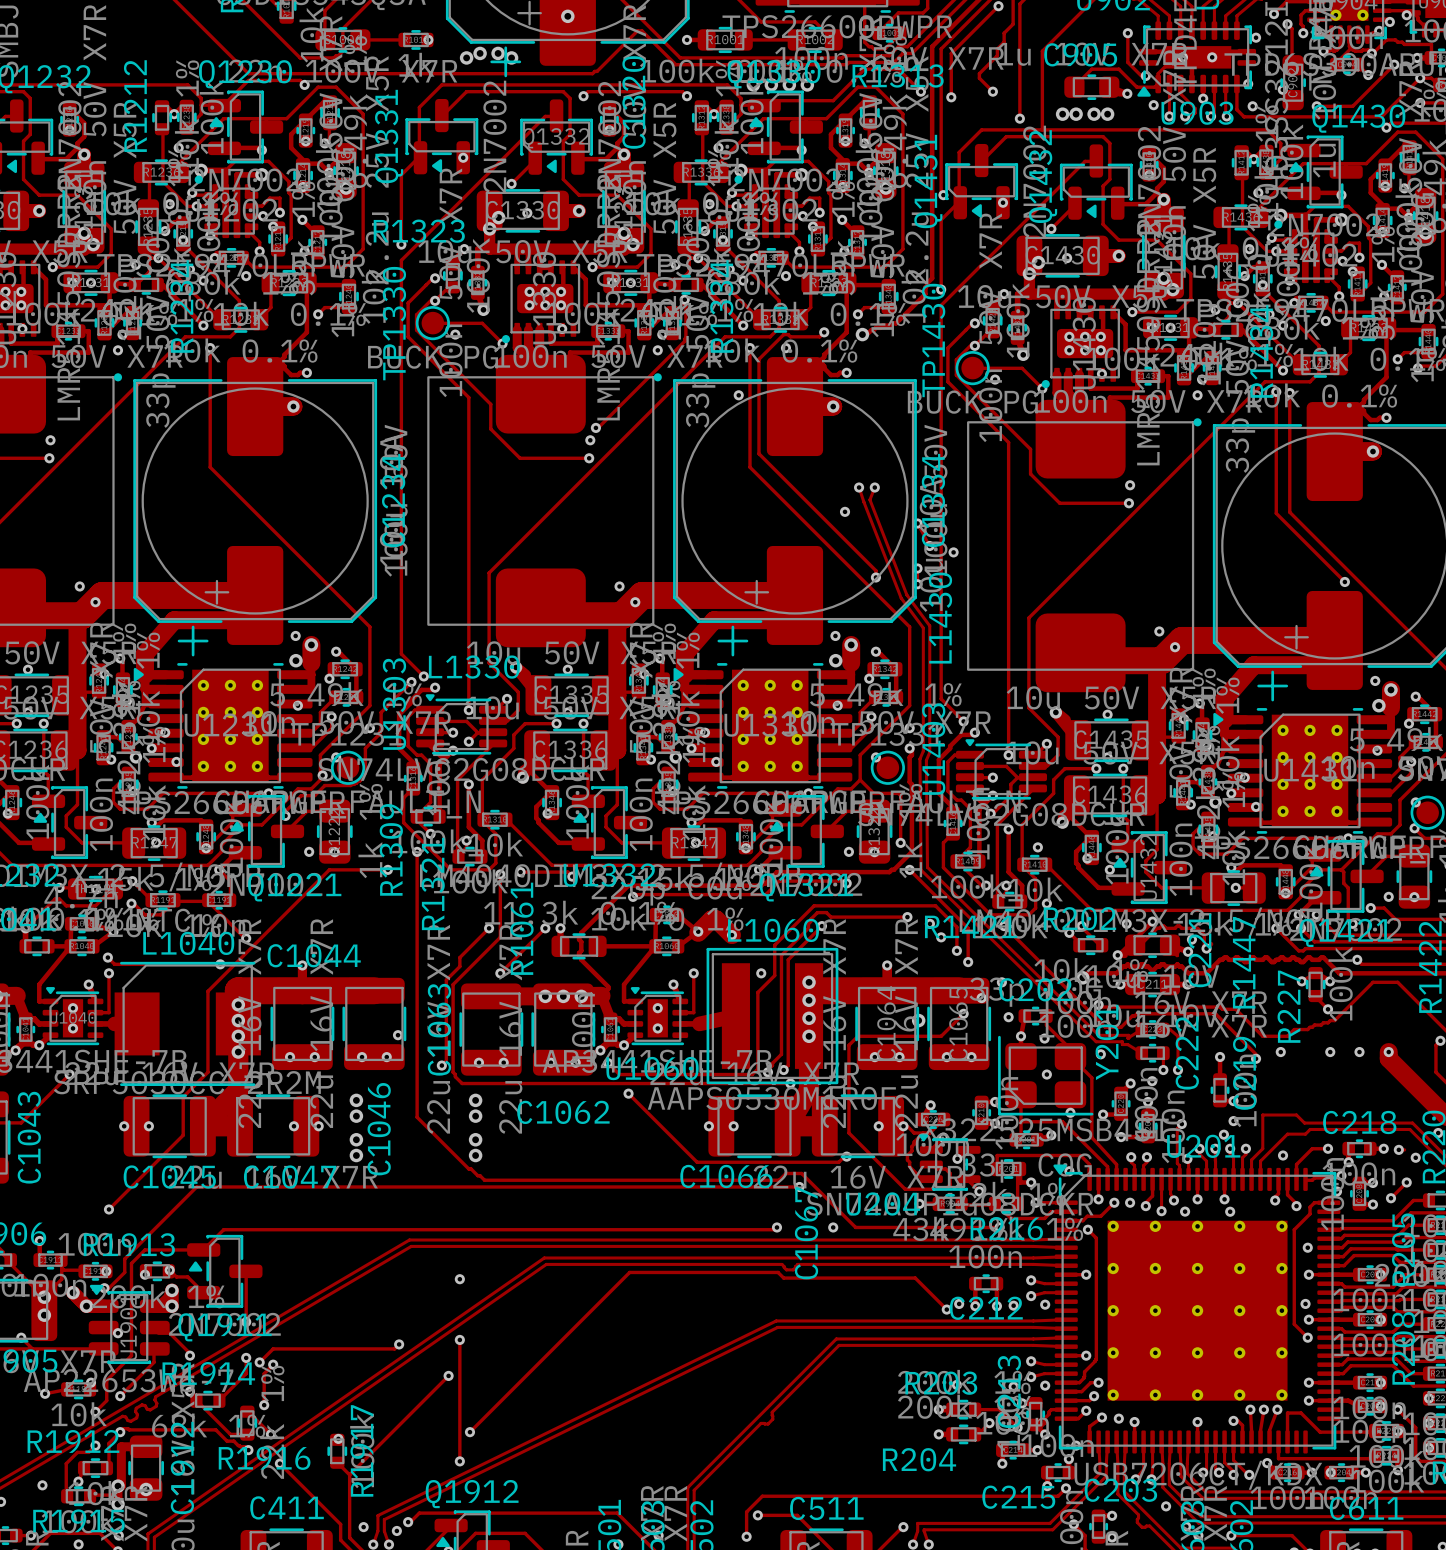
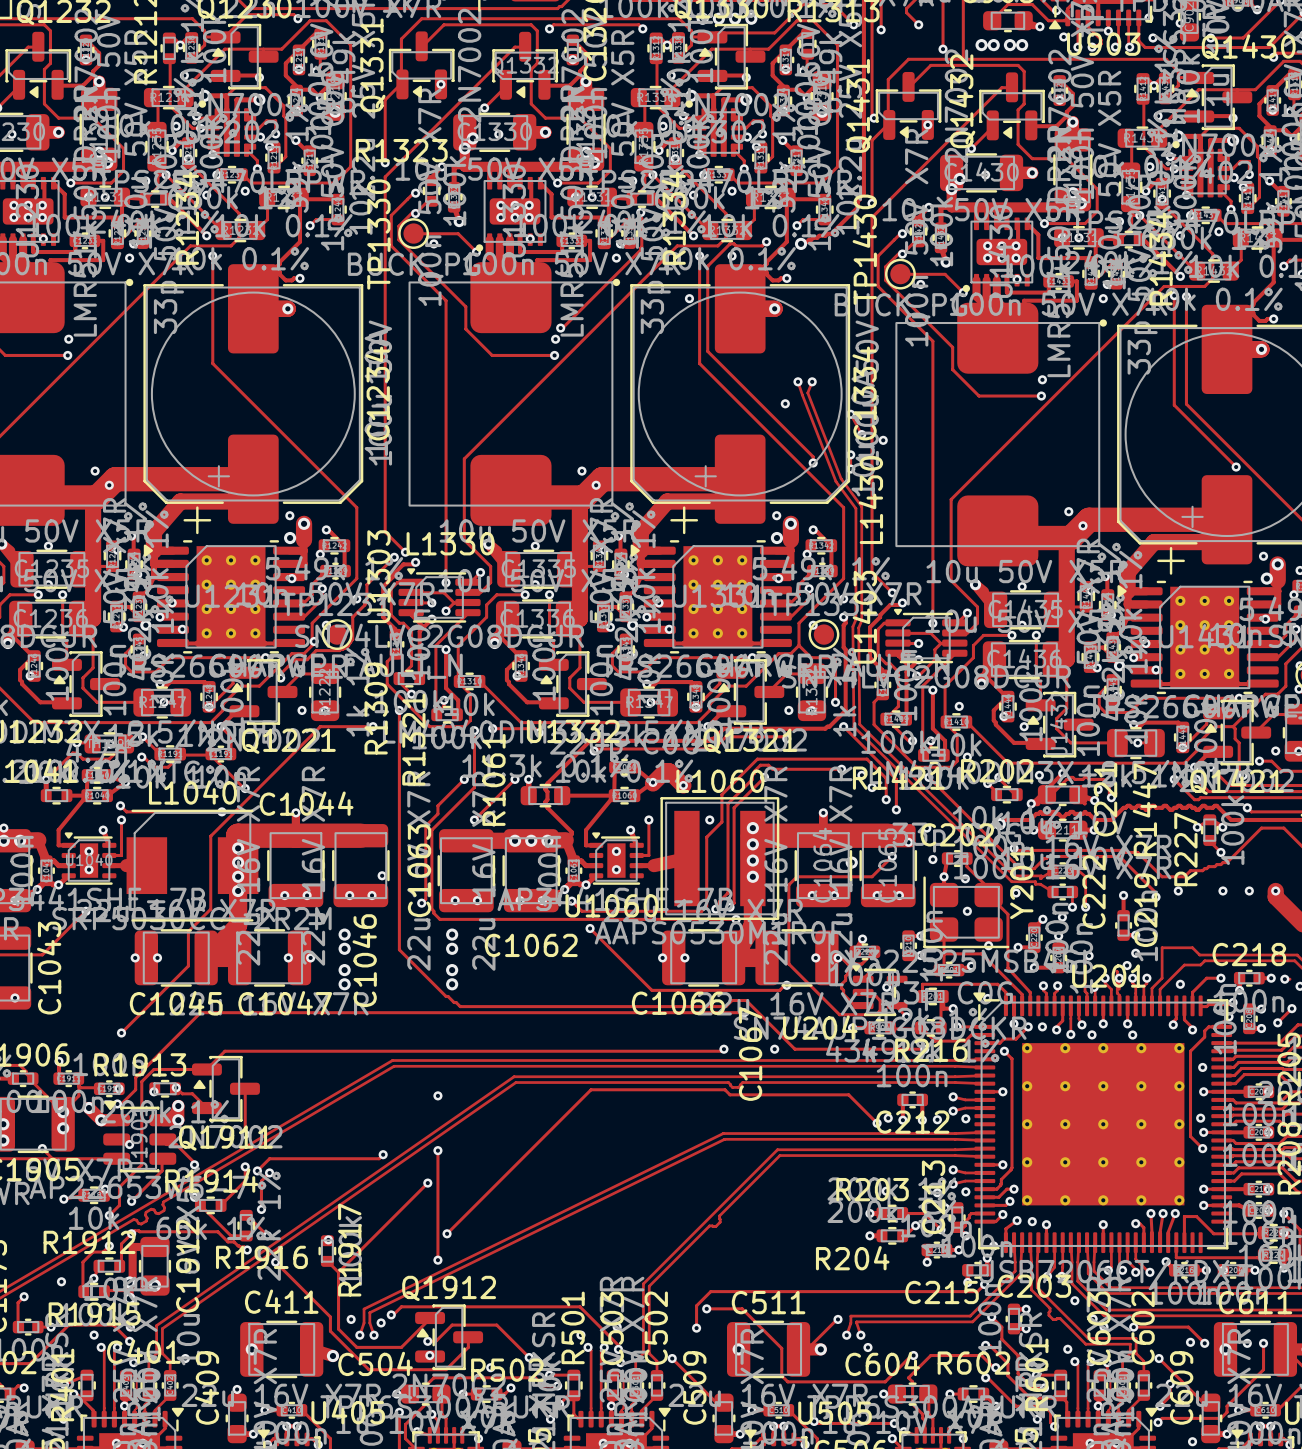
track: (1215, 1161) (1215, 1167) -> (1116, 971) (1117, 993) (1119, 995)

